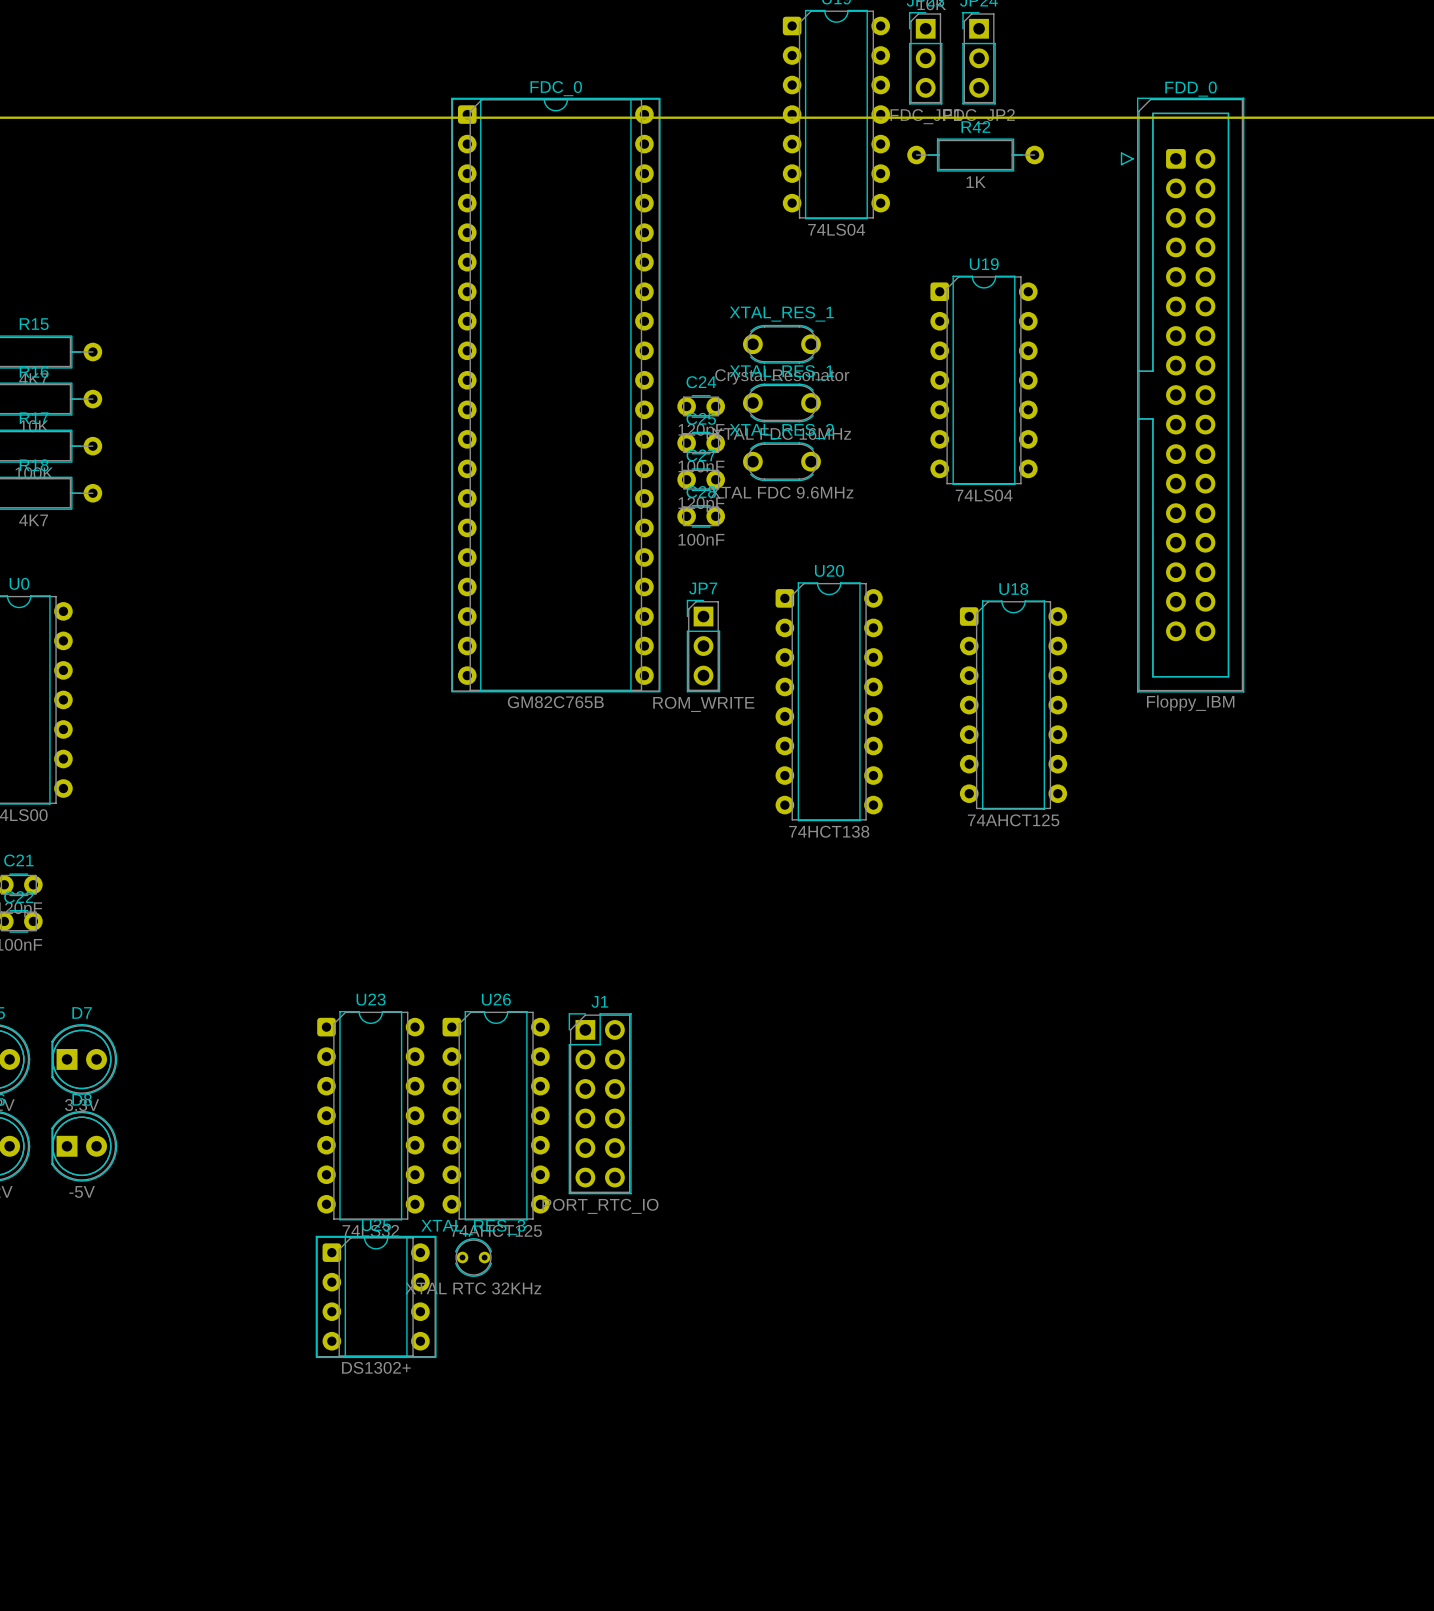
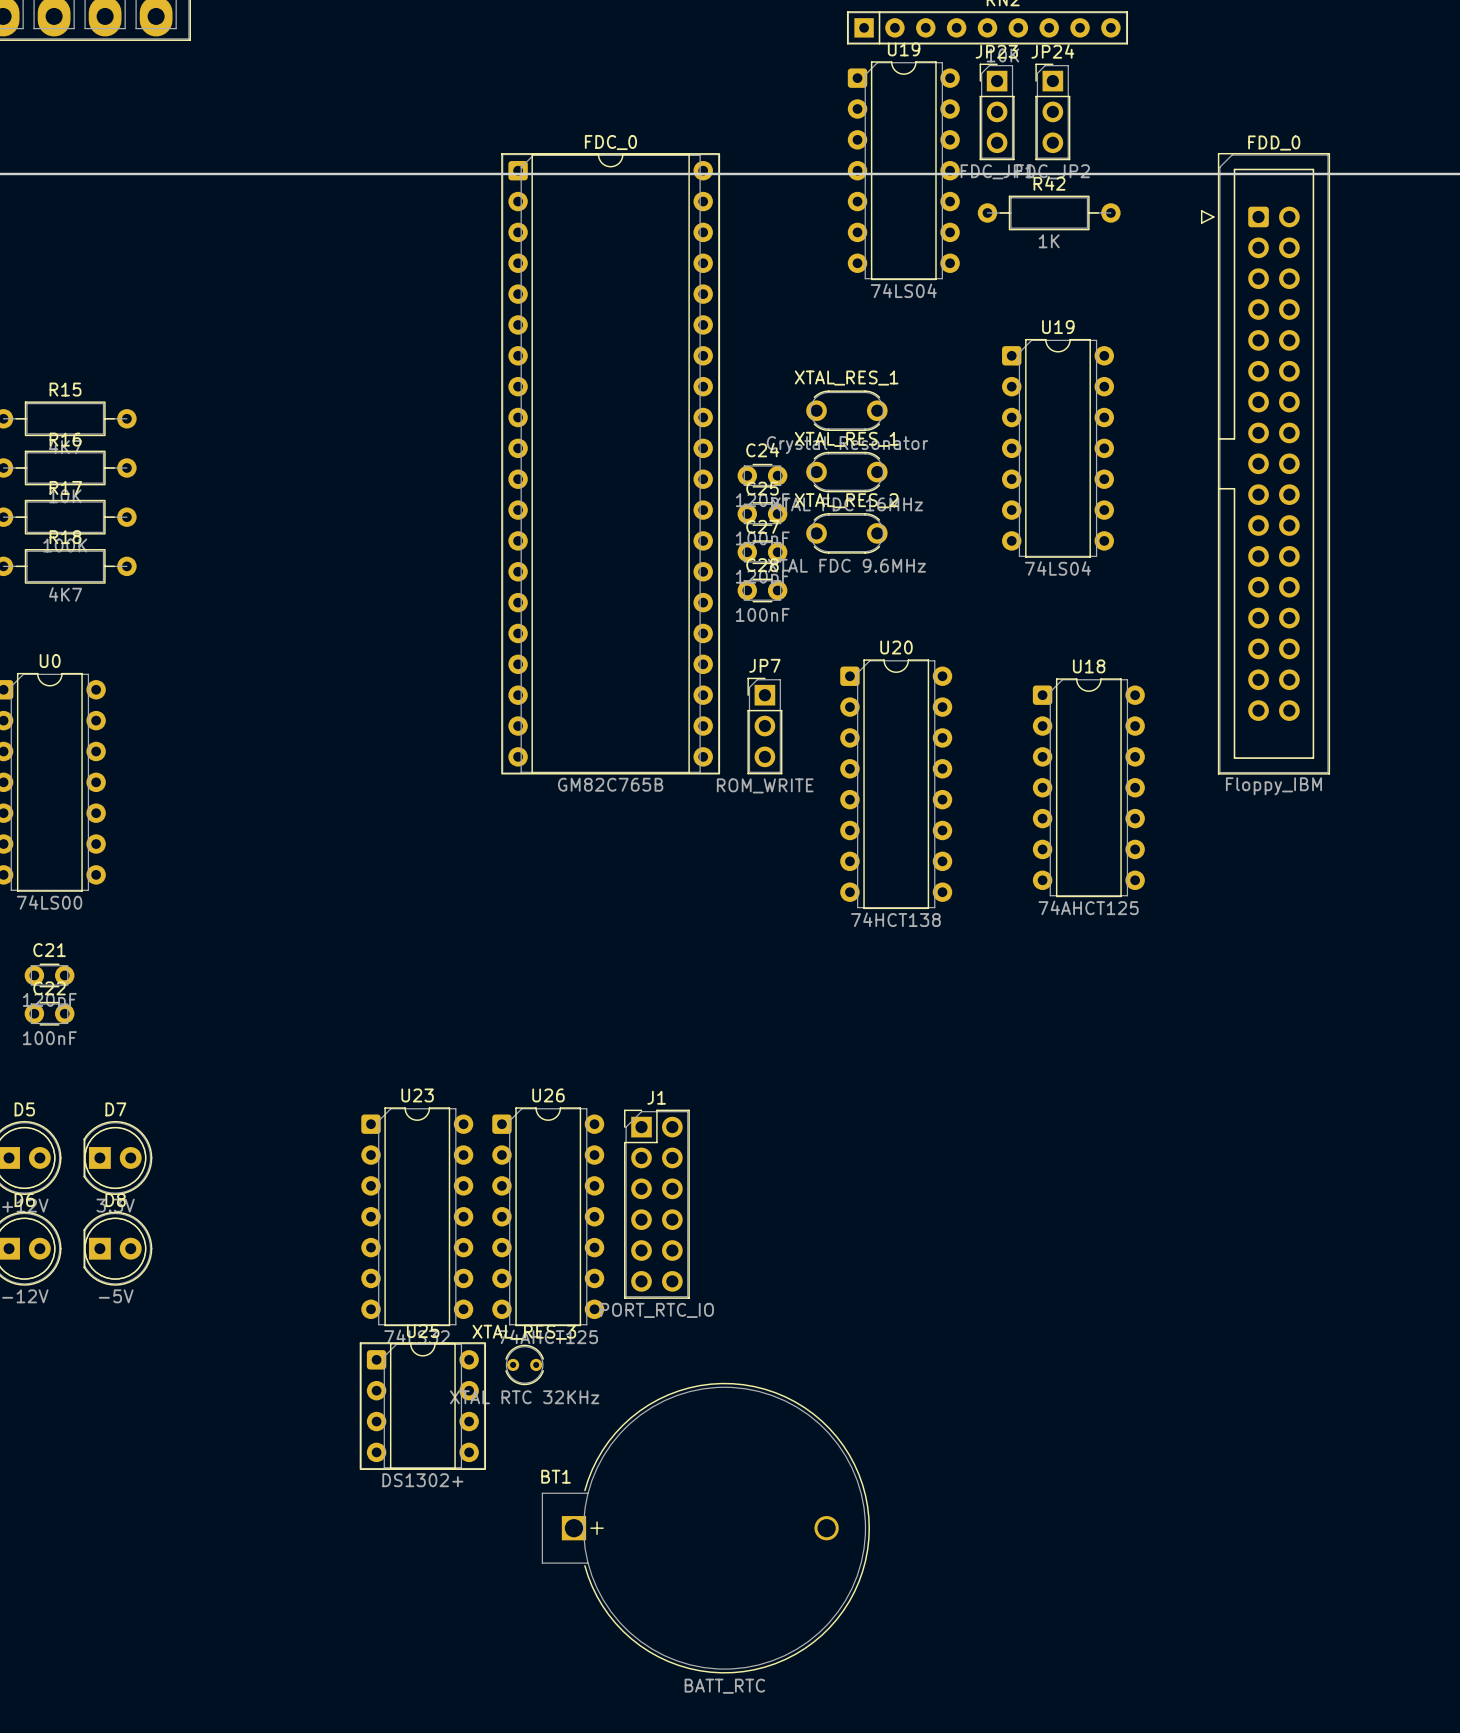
BT1: none -> BATT_RTC (705, 1528)

